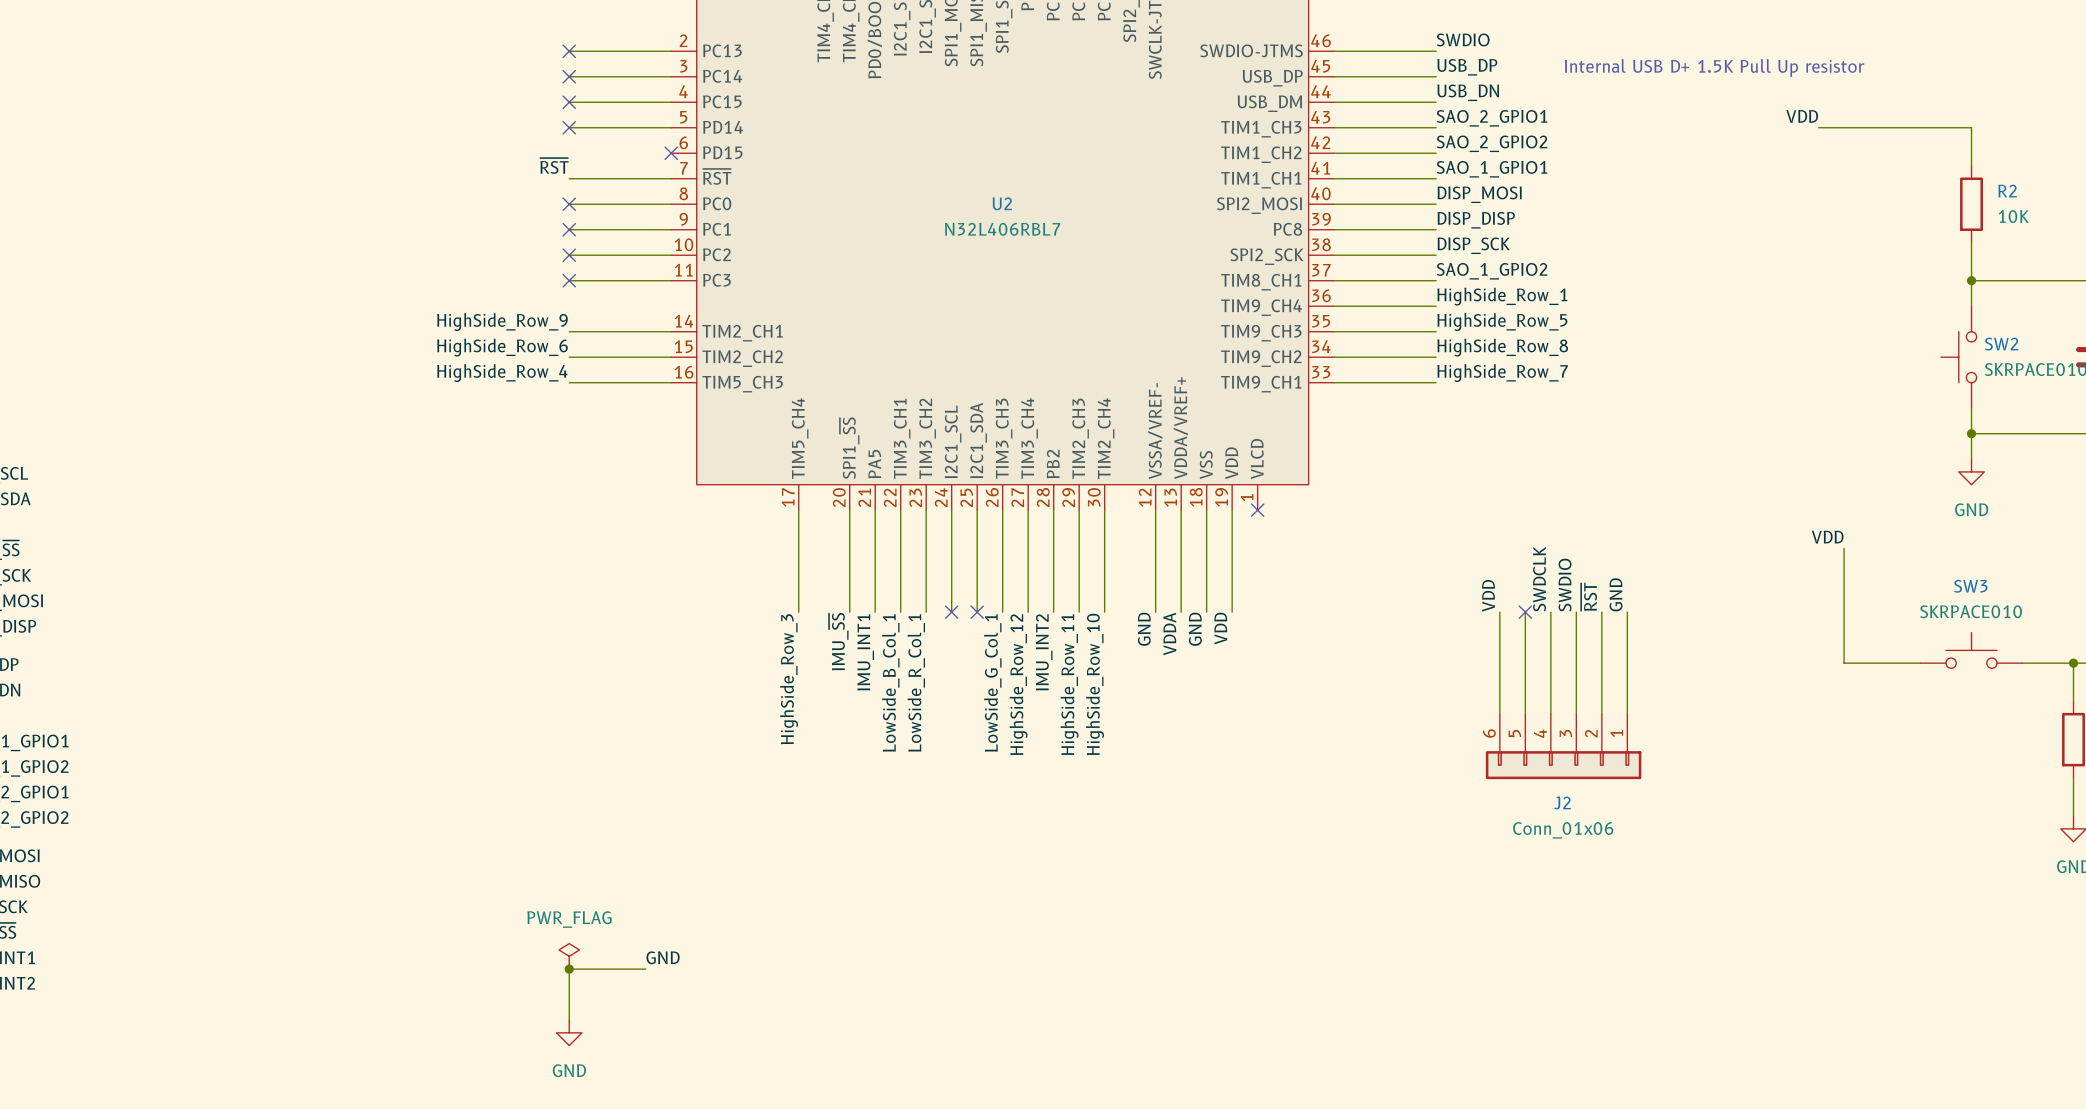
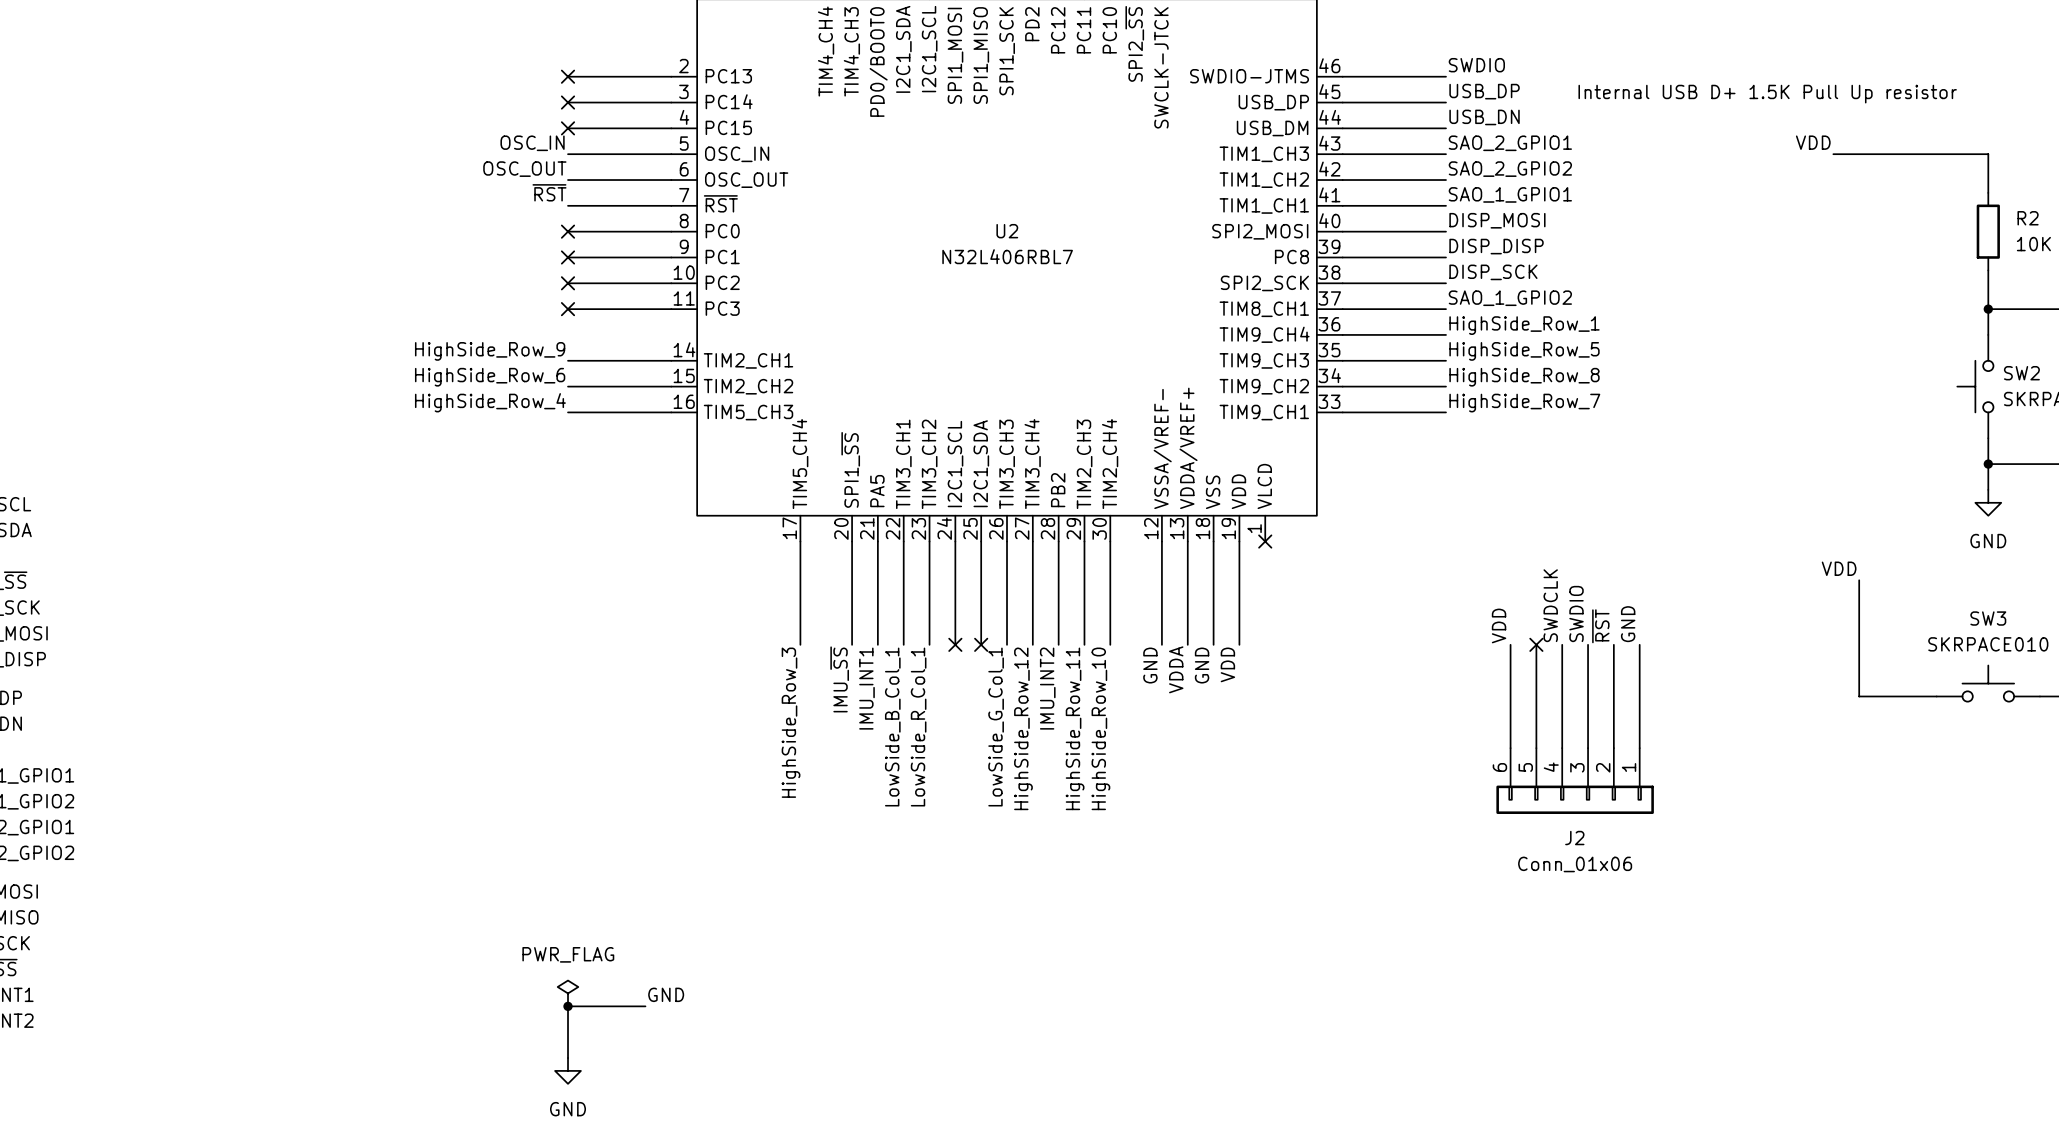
label: none -> OSC_IN (532, 143)
no-connect mark: (569, 127) -> none
U2 pin name: PD14 (723, 127) -> OSC_IN (737, 154)
label: none -> OSC_OUT (524, 169)
U2 pin name: PD15 (722, 152) -> OSC_OUT (746, 180)
wire: none -> (568, 180) (671, 180)
no-connect mark: (671, 153) -> none

